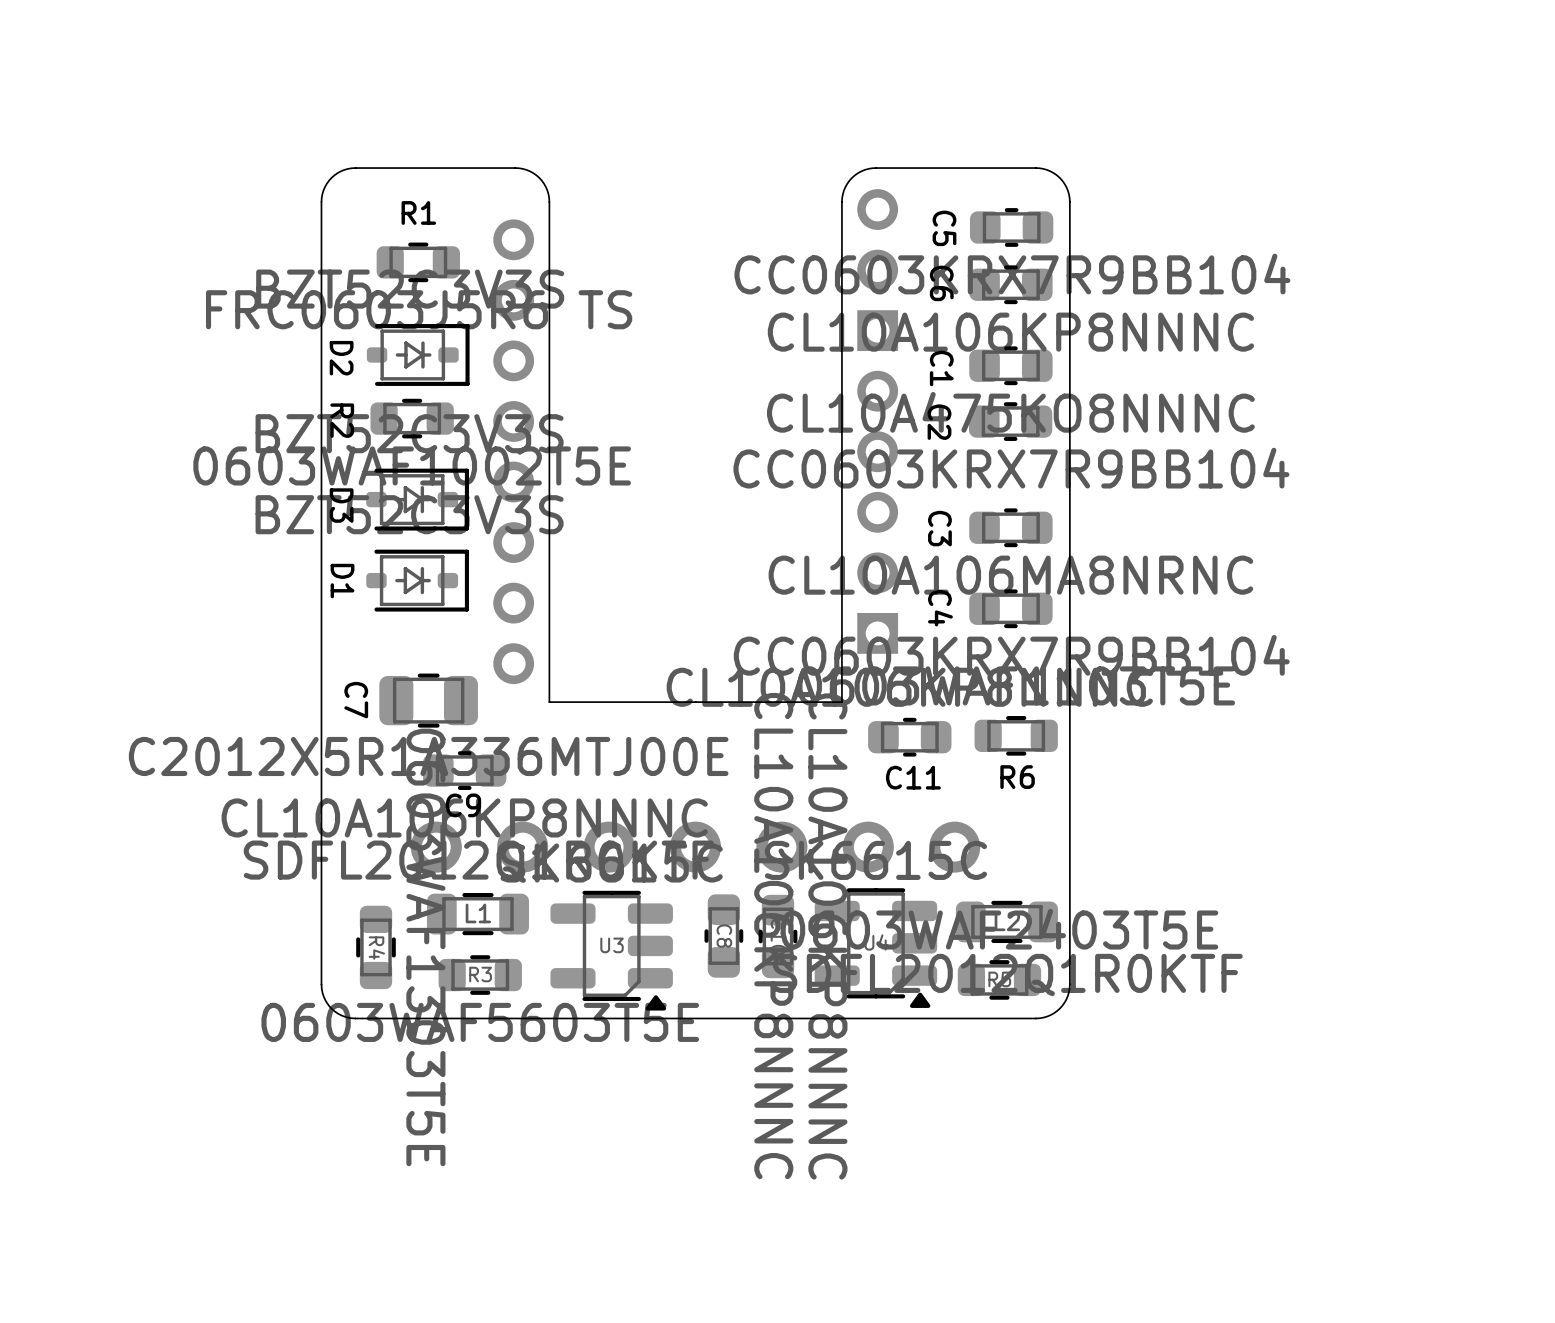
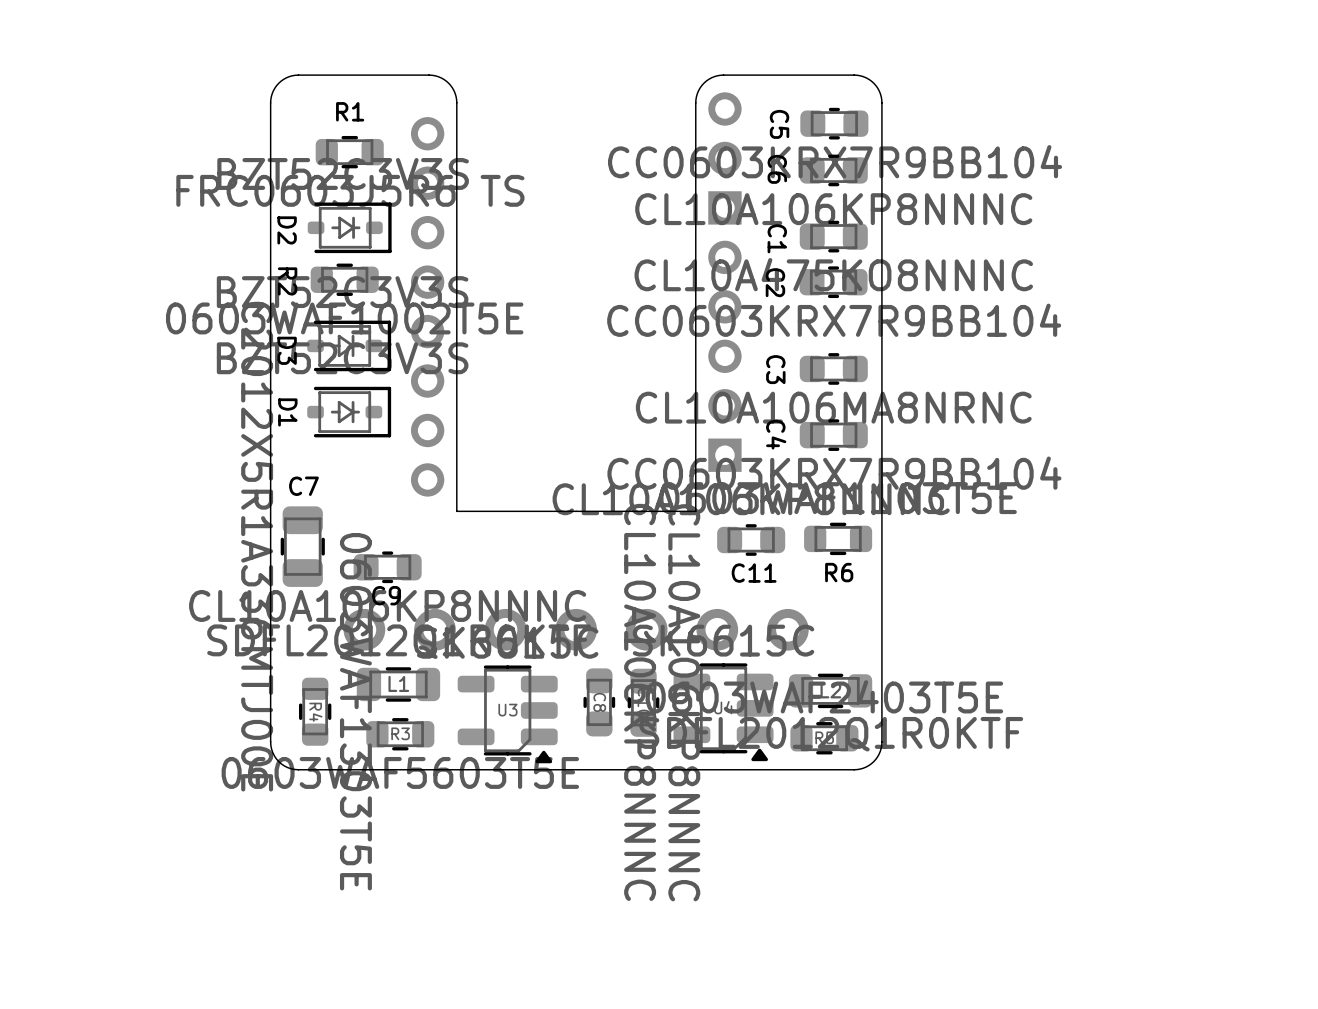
C7 rotation: 0° (428, 700) -> 90° clockwise (302, 546)
C7 position: (428, 700) -> (302, 546)

